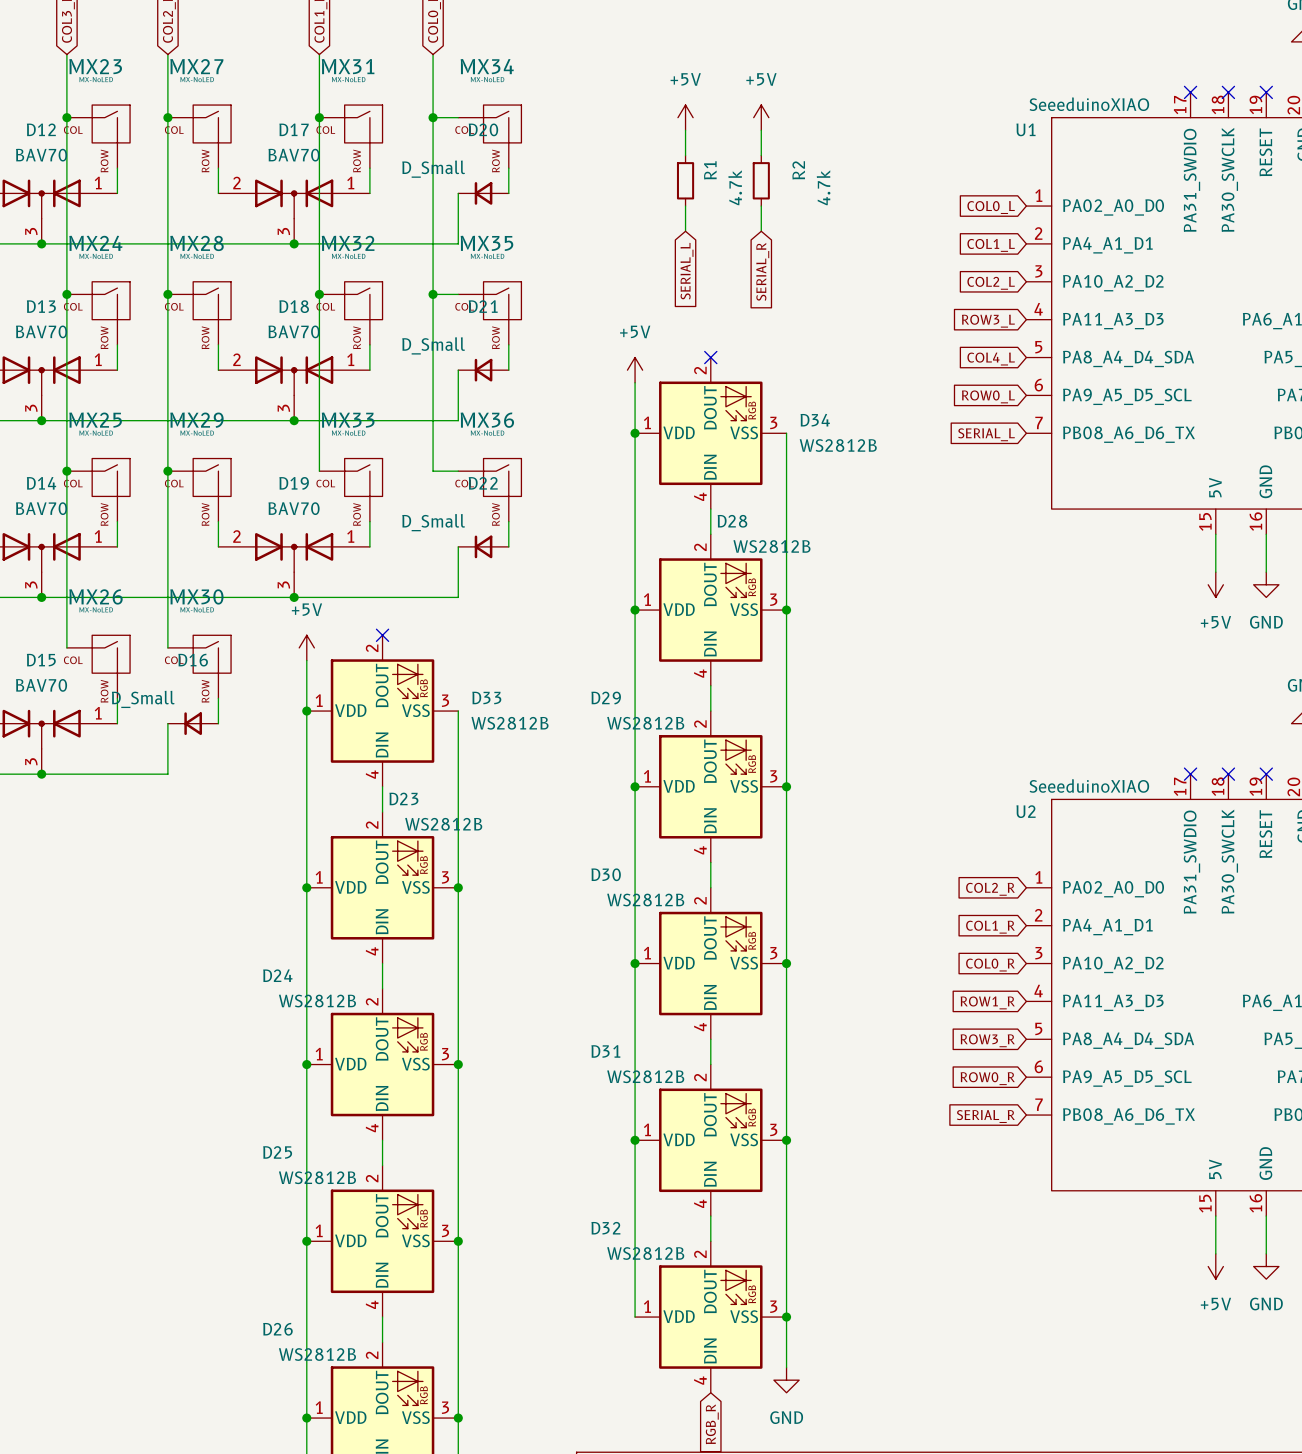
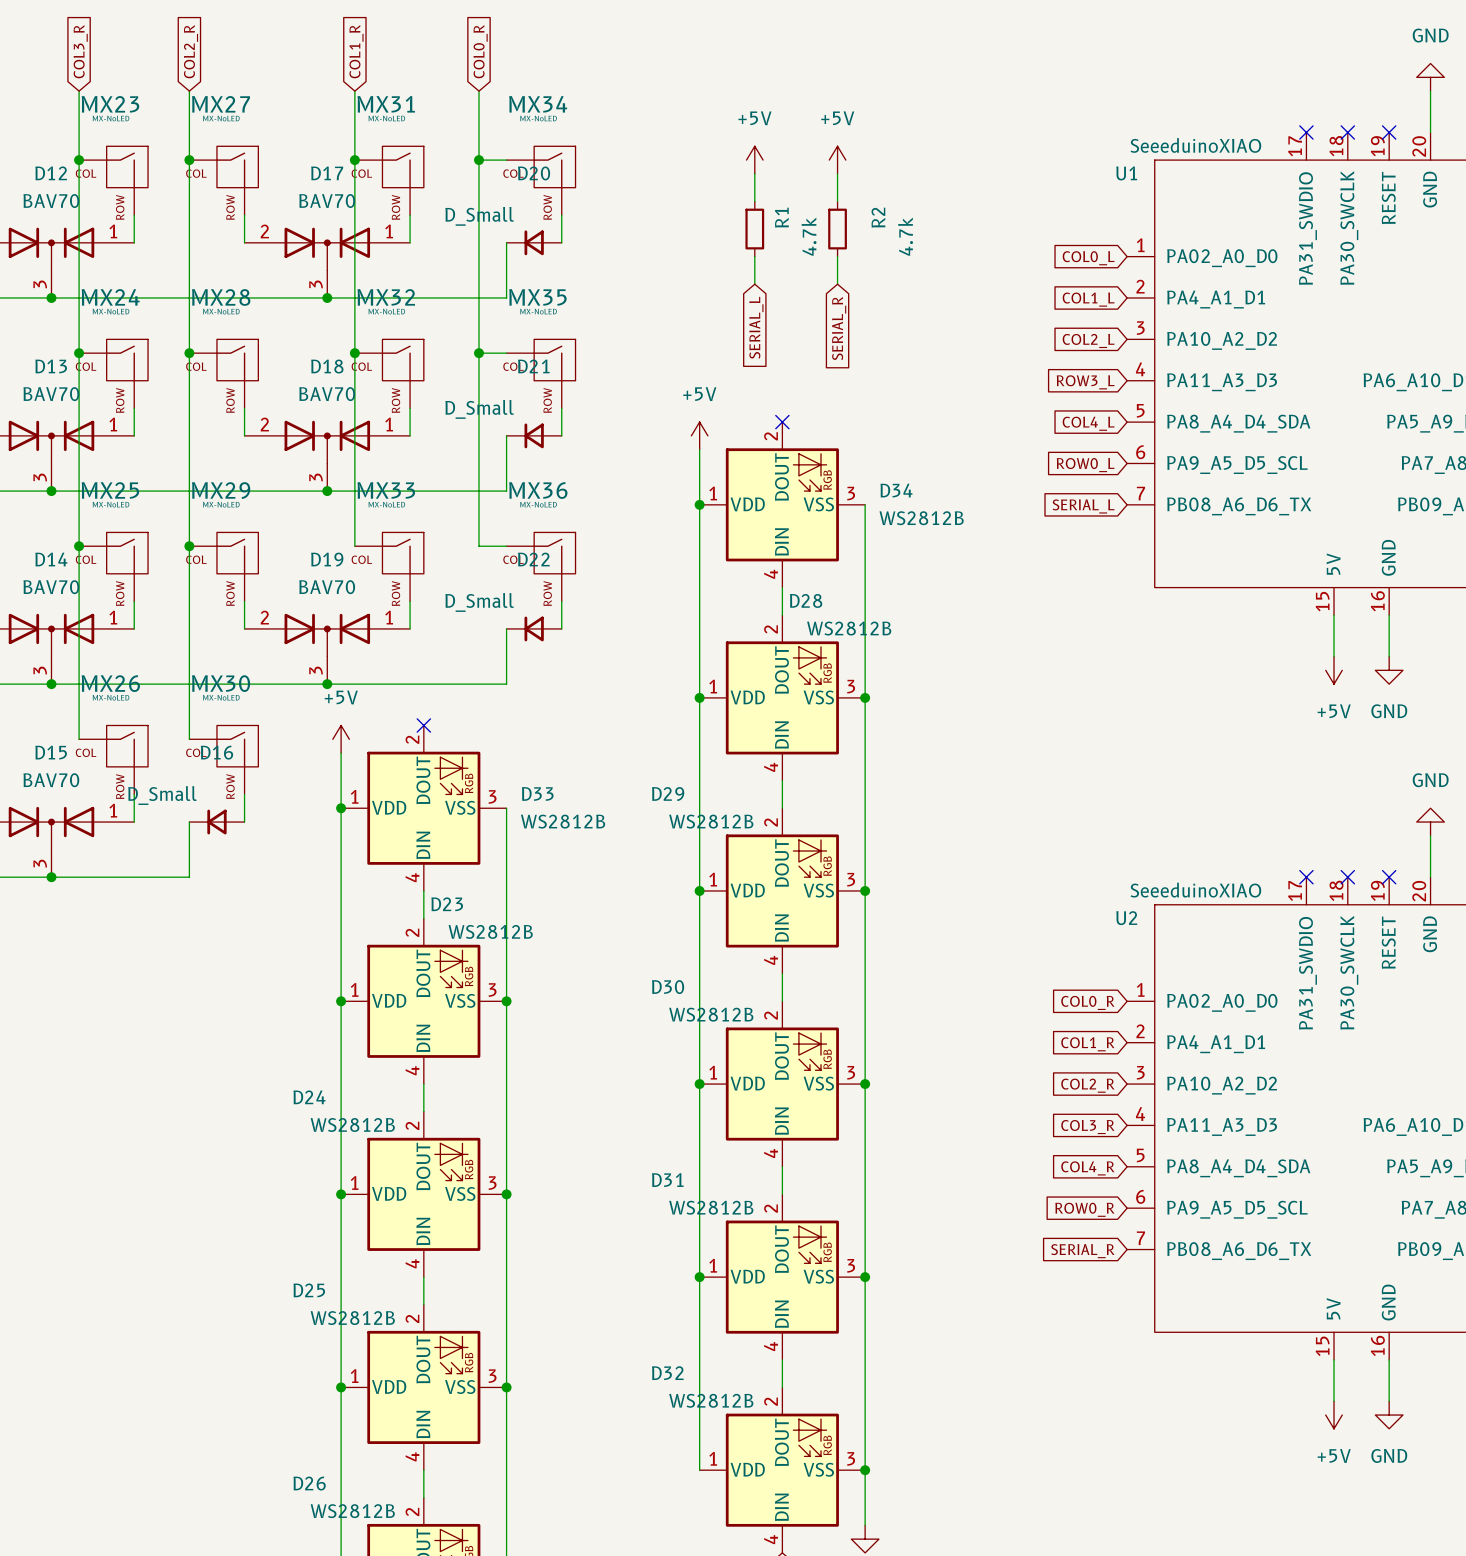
global label: COL2_R (990, 889) -> COL0_R (1087, 1002)
global label: COL0_R (990, 965) -> COL2_R (1087, 1085)
global label: ROW1_R (987, 1002) -> COL3_R (1087, 1127)
global label: ROW3_R (987, 1040) -> COL4_R (1087, 1168)

